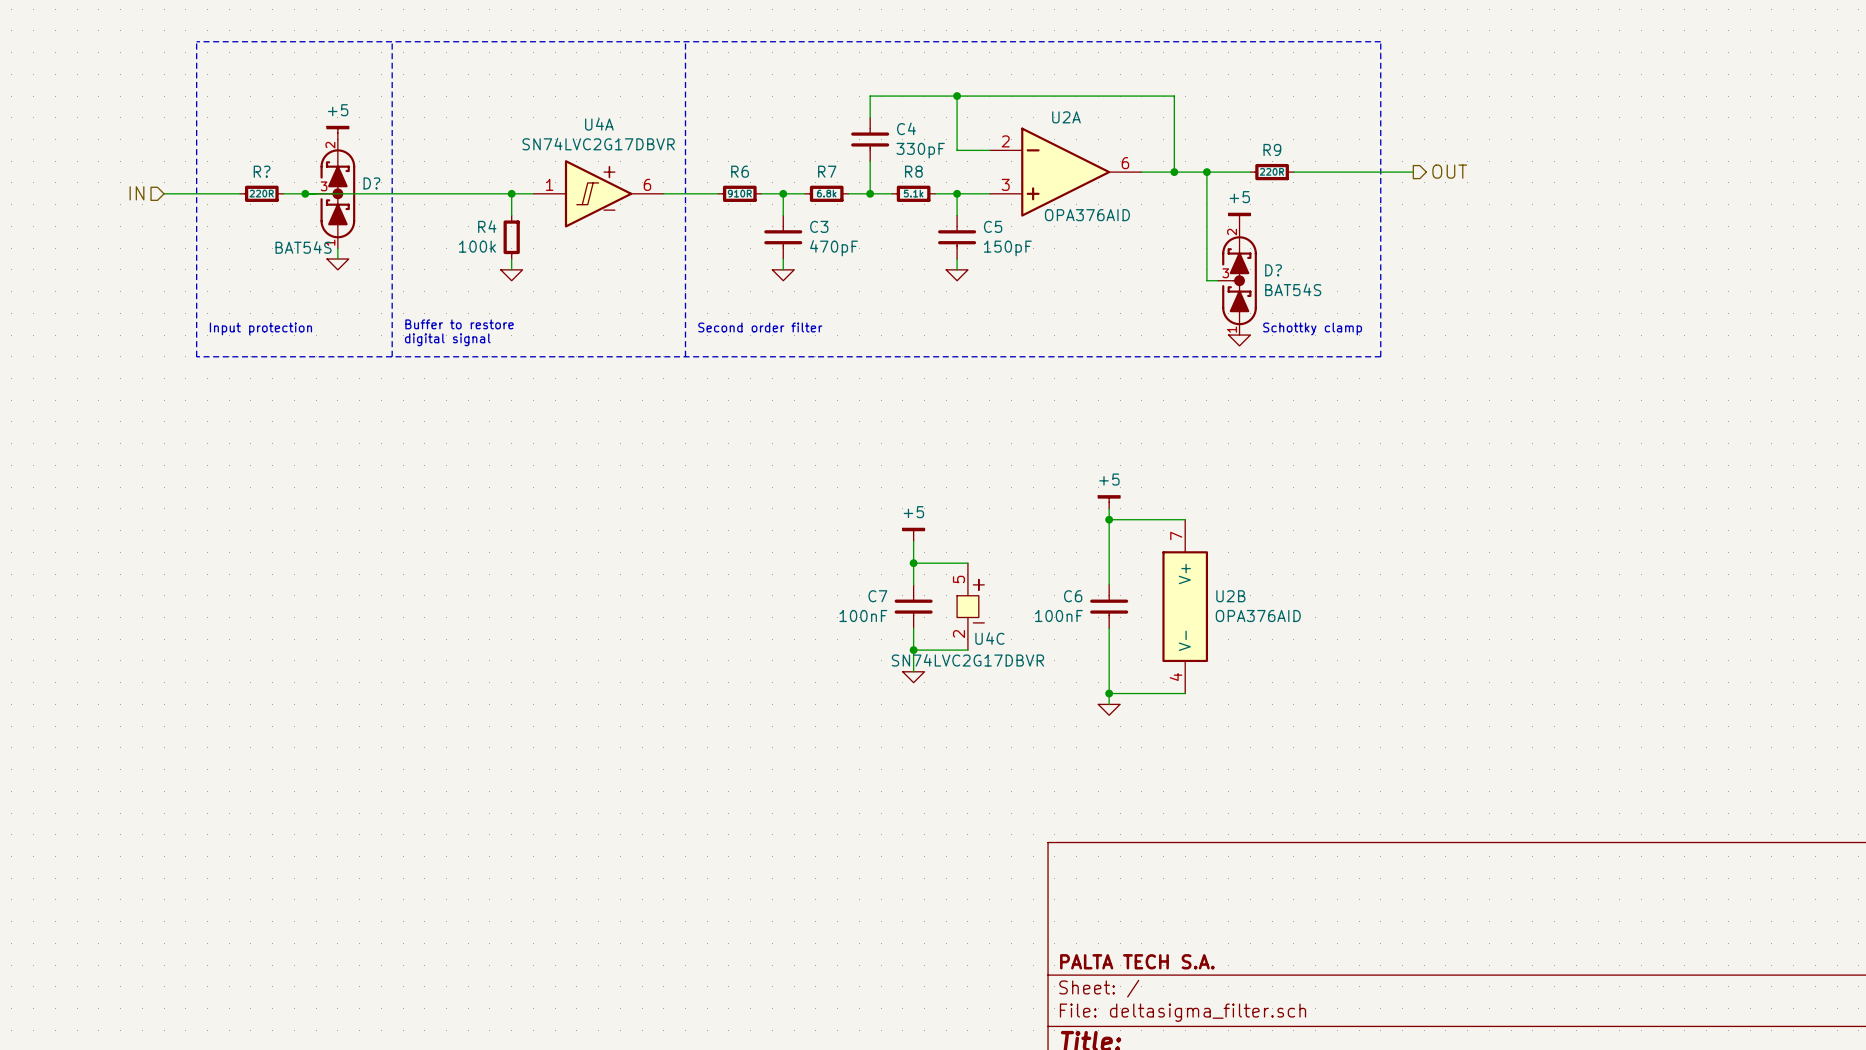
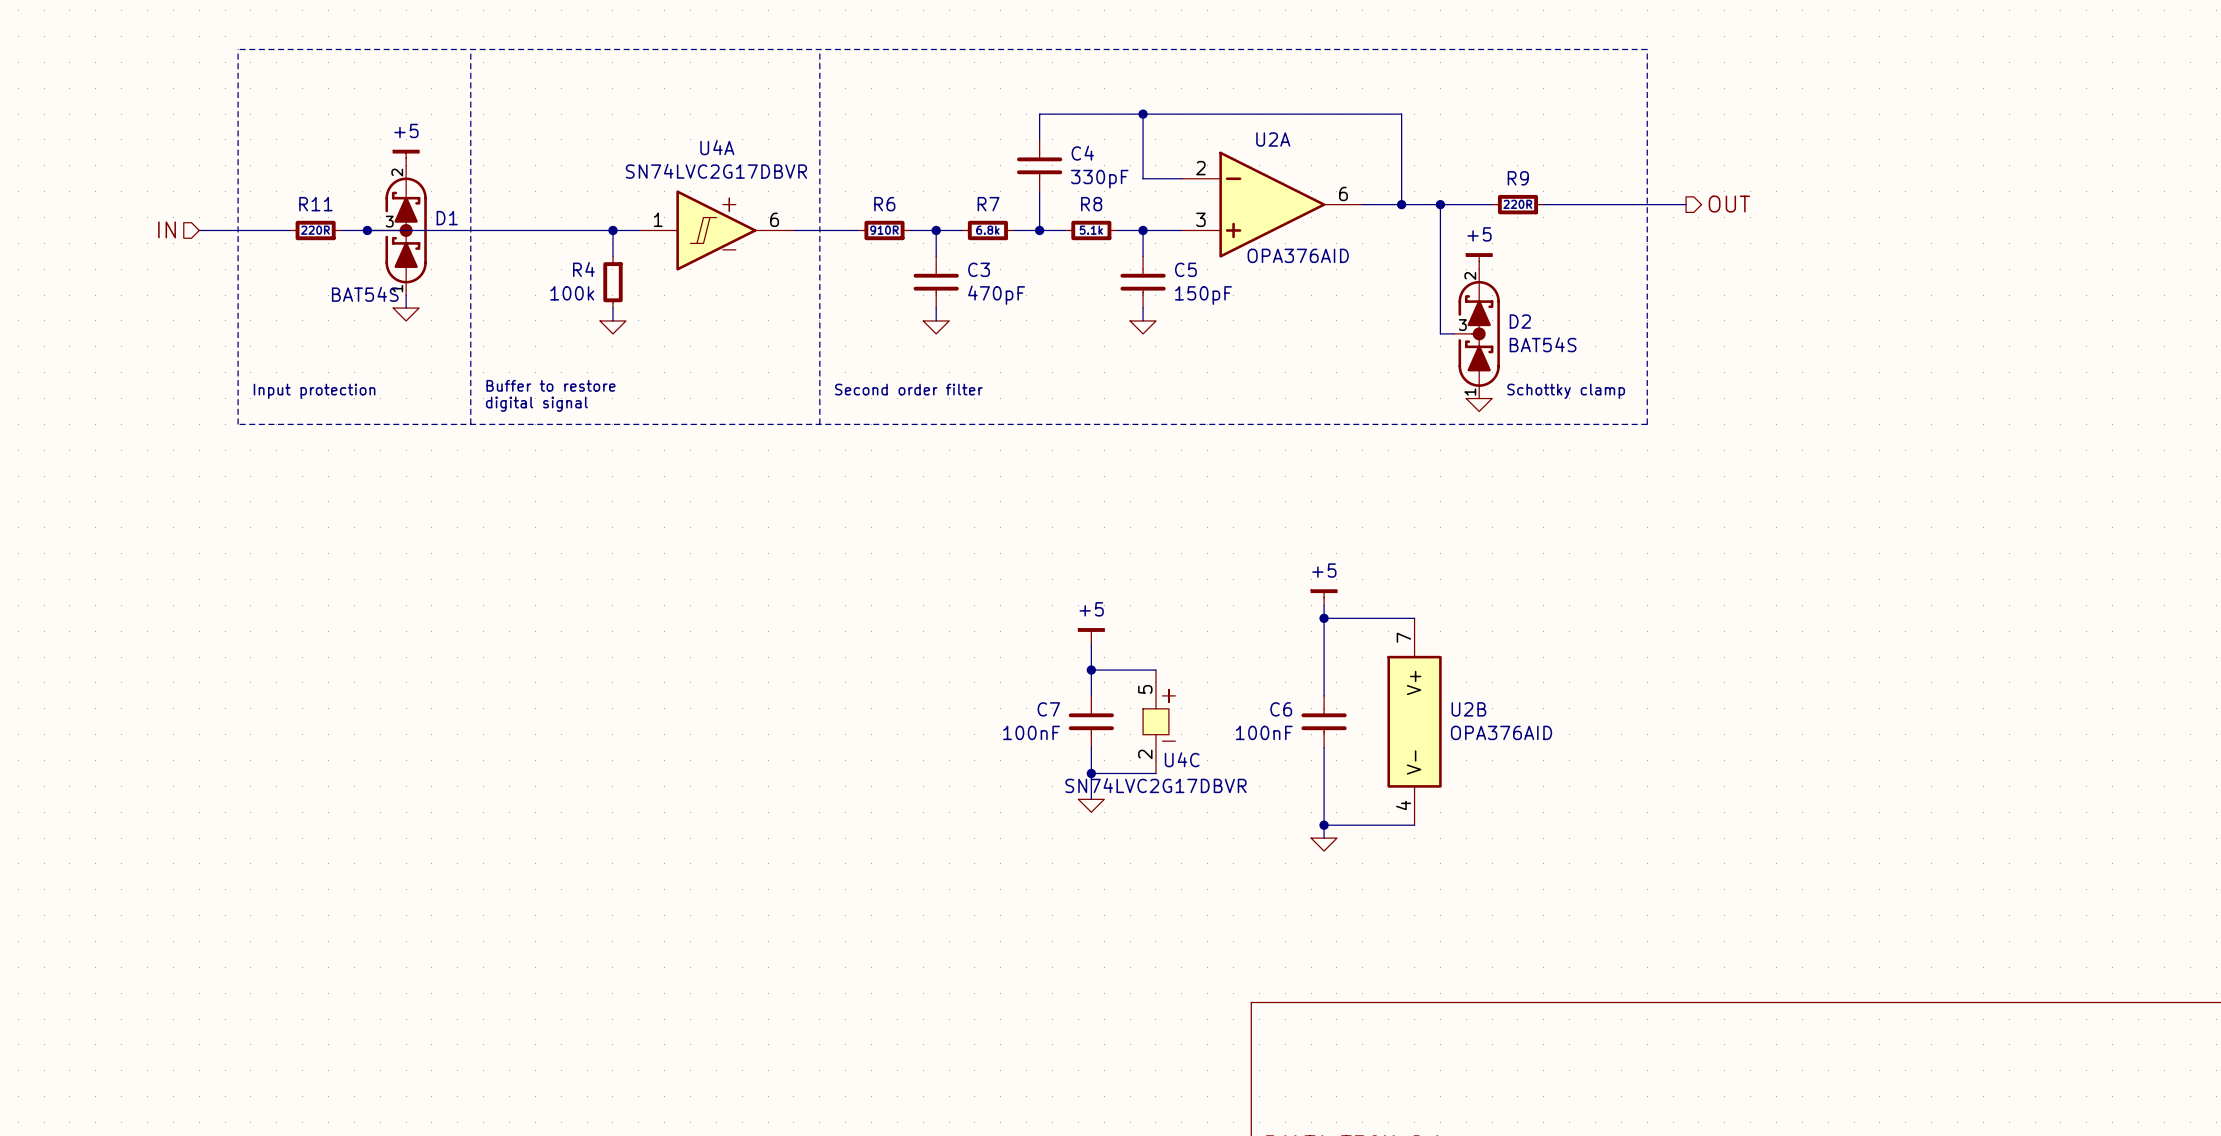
R? name: R? (262, 171) -> R11 (315, 204)
D? name: D? (371, 183) -> D1 (447, 218)
D? name: D? (1273, 270) -> D2 (1520, 321)

